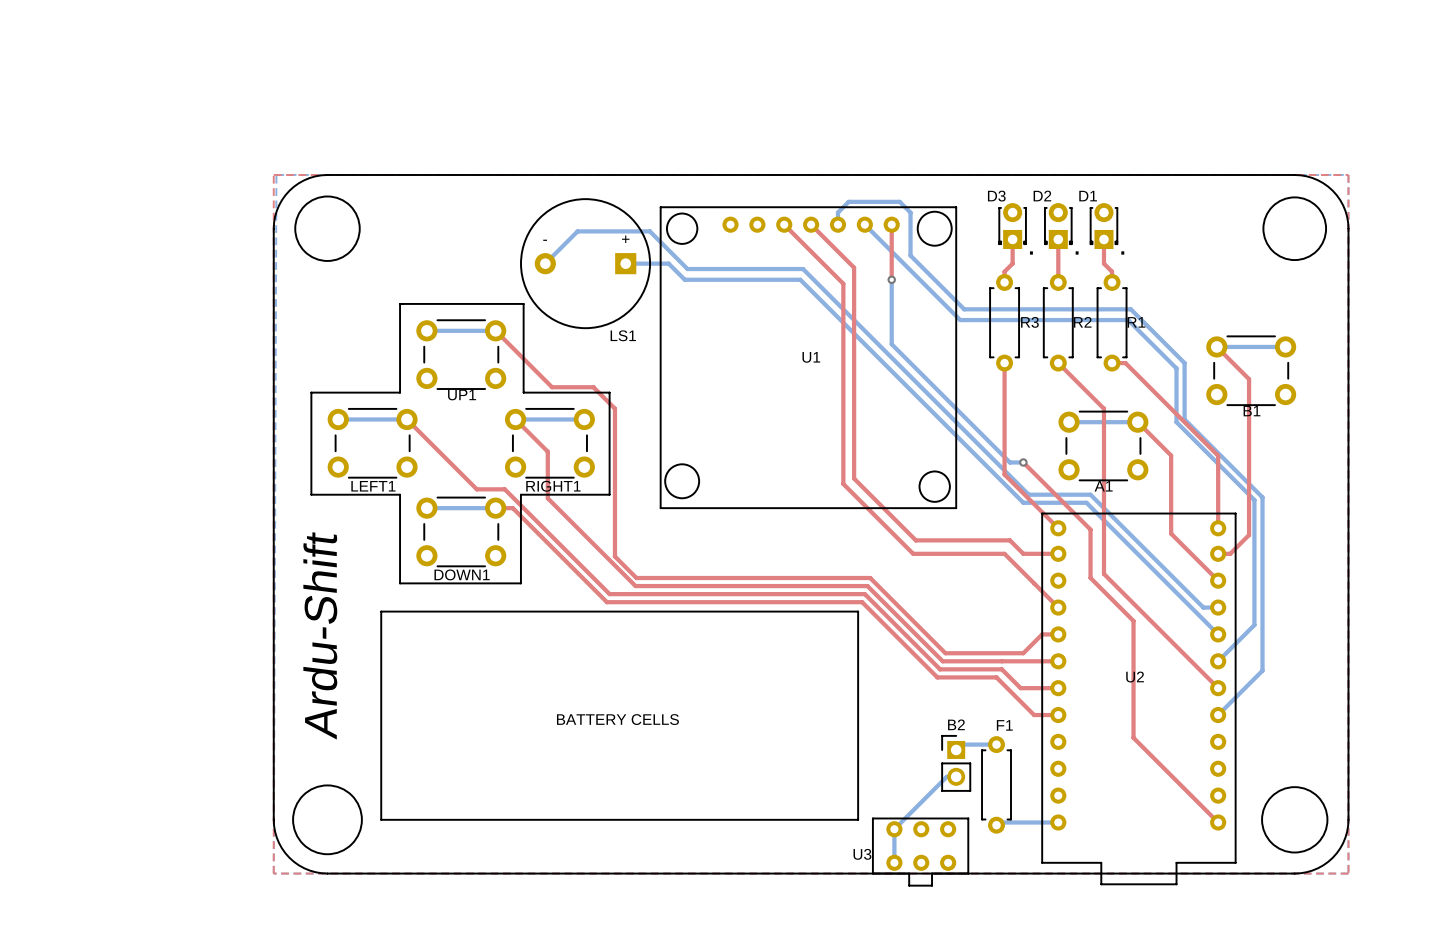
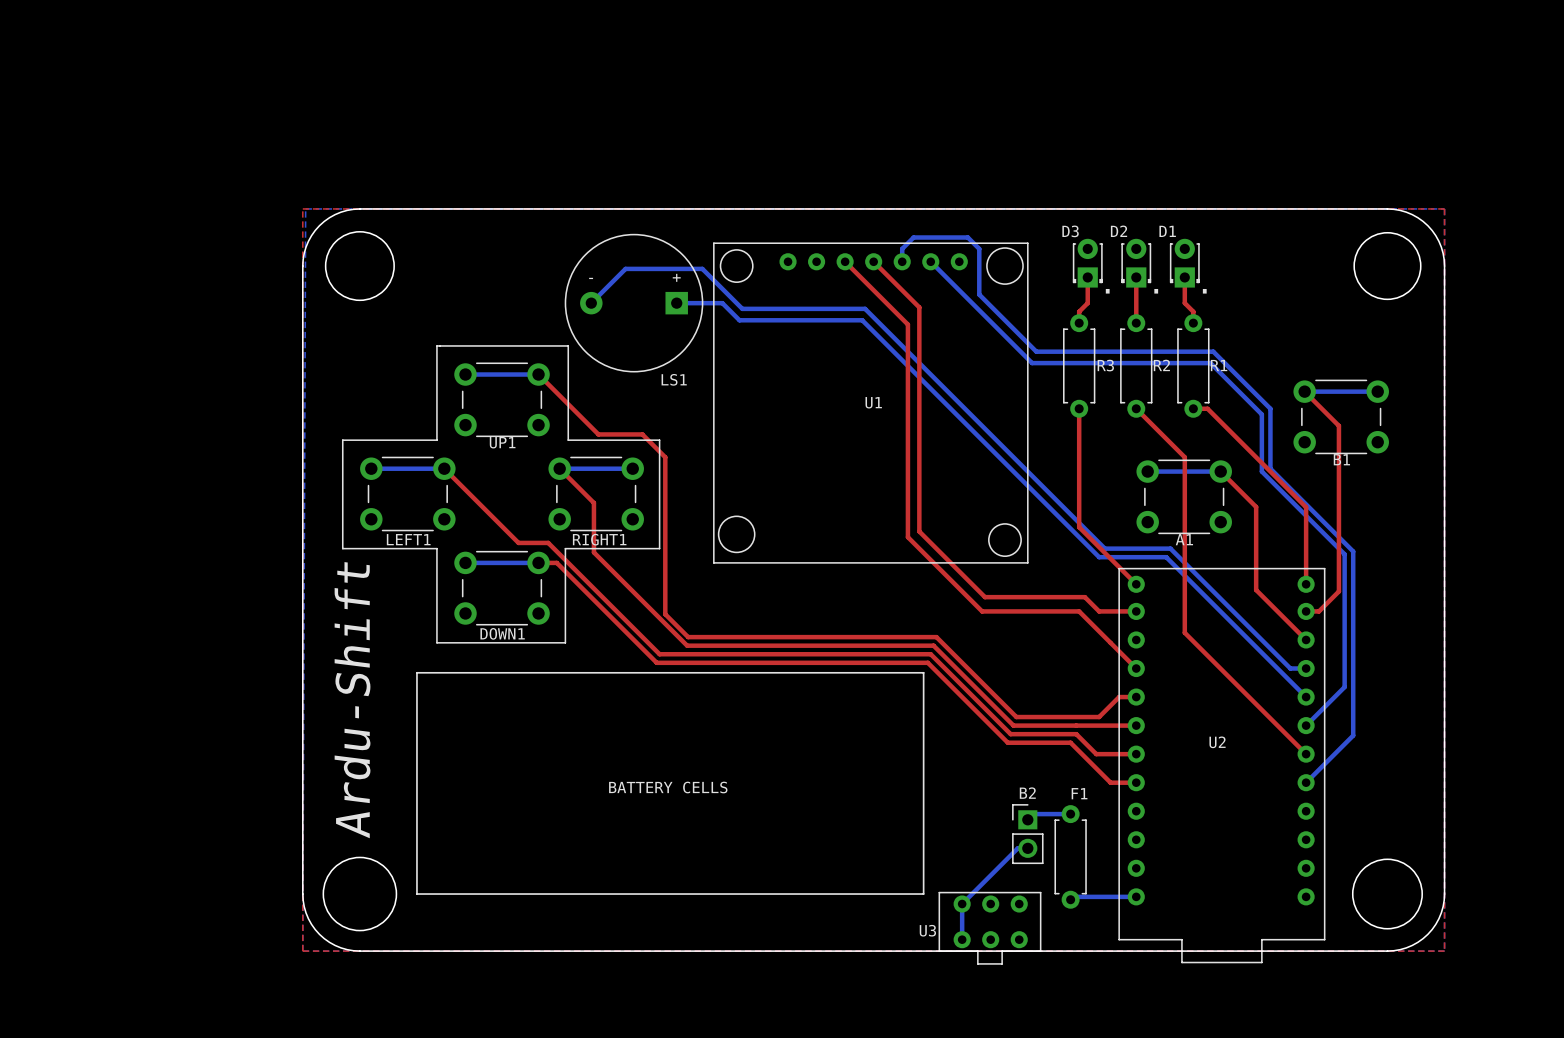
top track: (891, 224) (891, 279) -> none
bottom track: (891, 279) (891, 344) (1009, 462) (1023, 462) -> none
via: (891, 279) -> none
top track: (1023, 462) (1090, 529) (1090, 578) (1133, 621) (1133, 737) (1218, 822) -> none
via: (1023, 462) -> none

